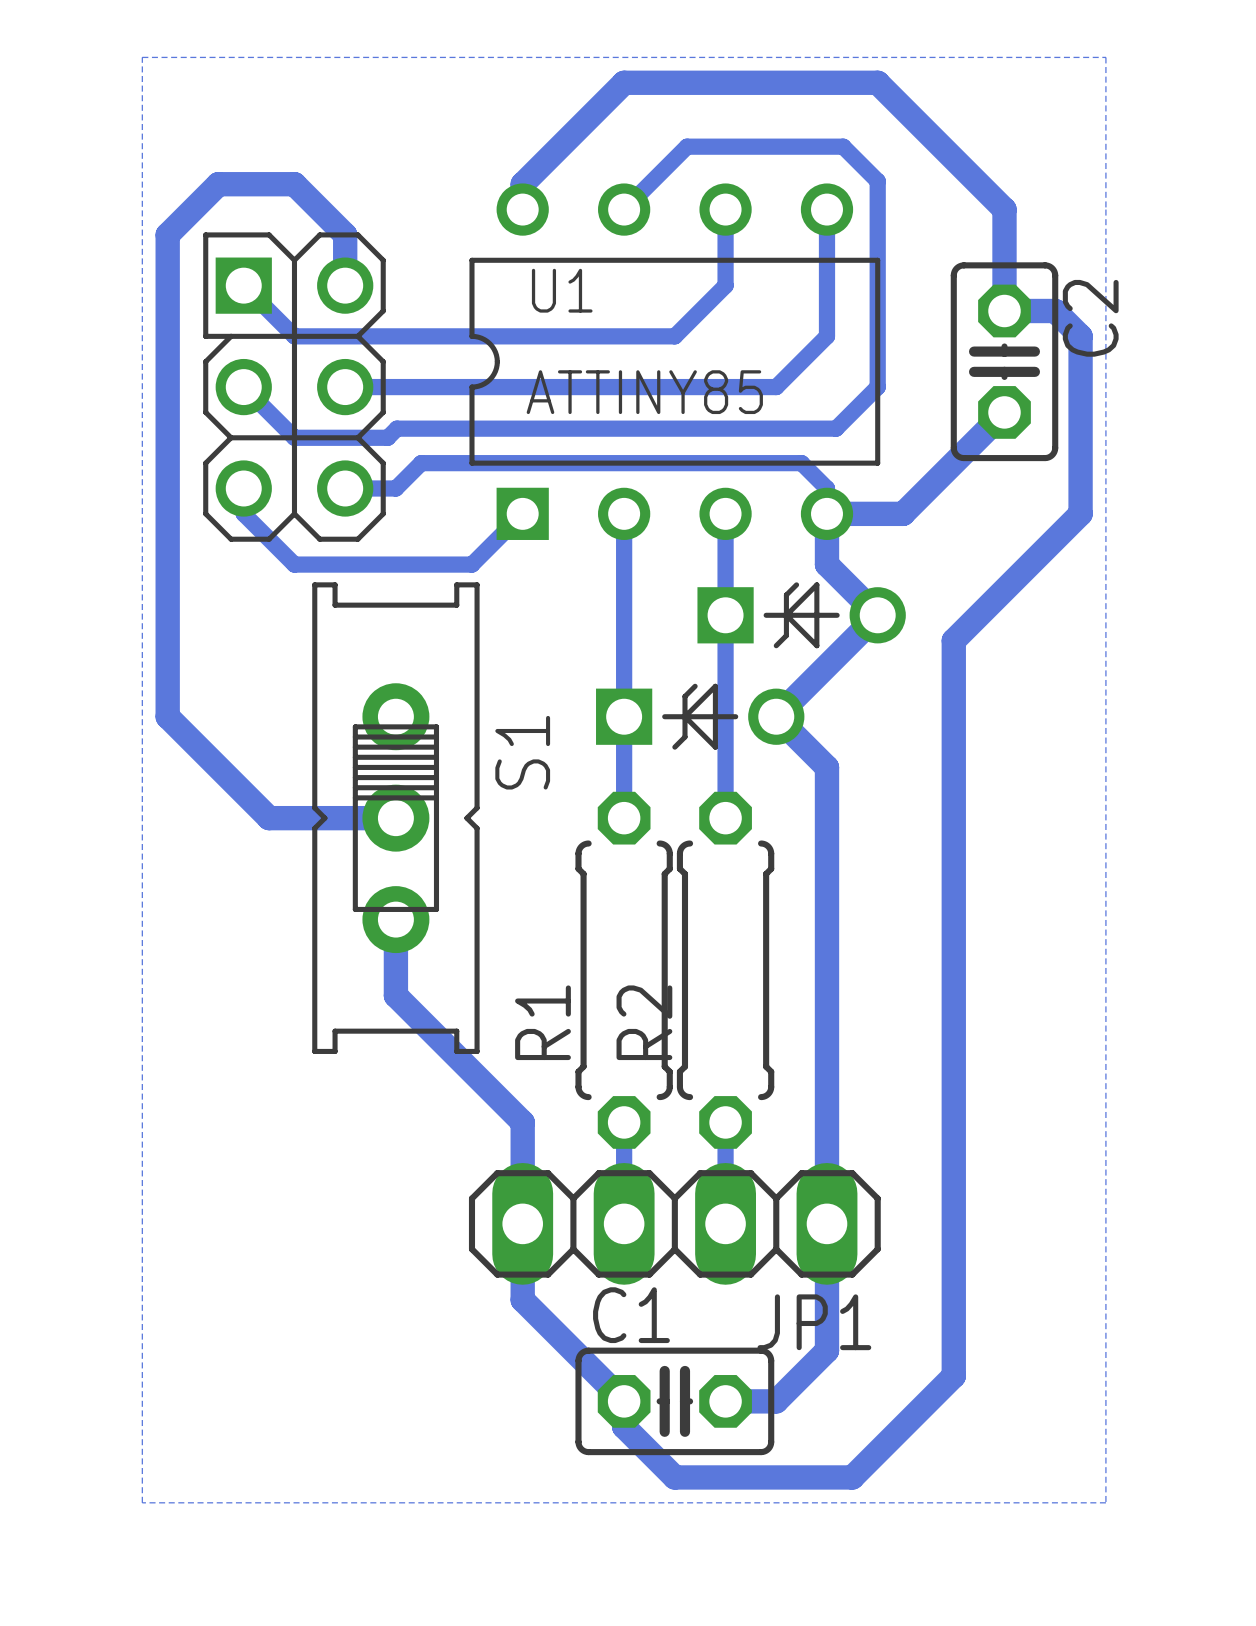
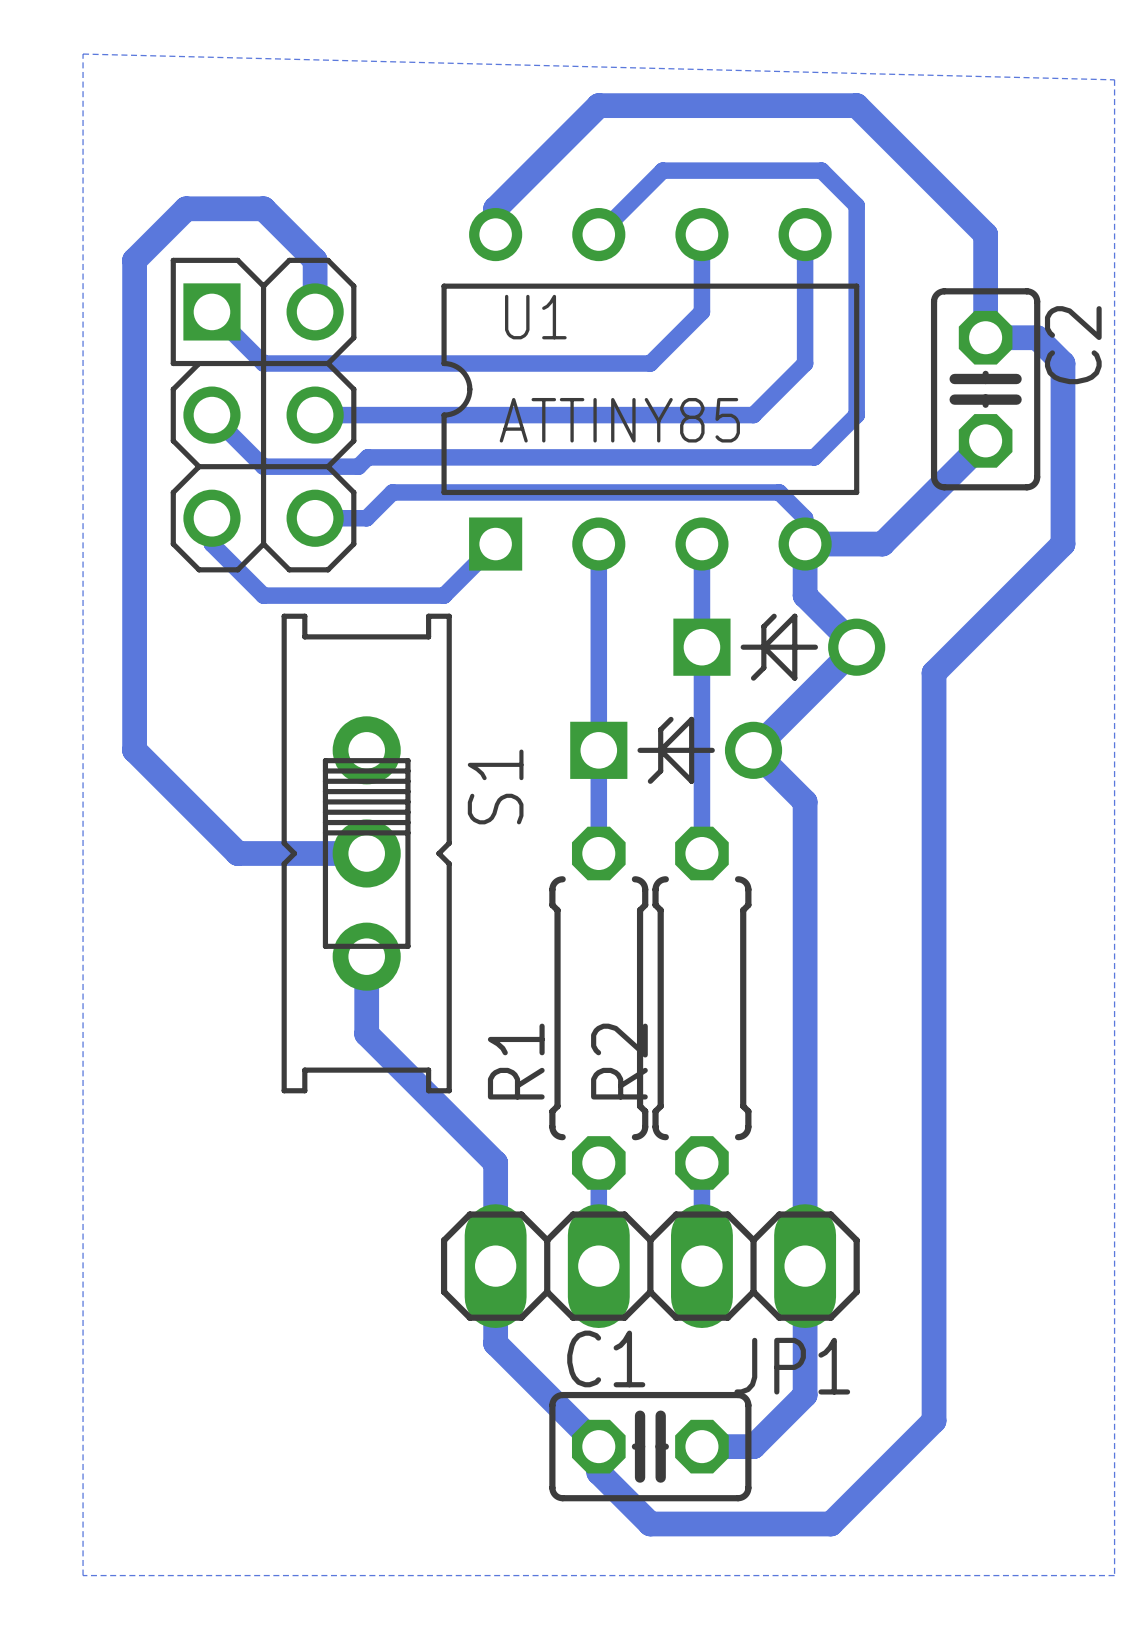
bottom zone outline: (142, 57) (1105, 57) (1105, 1502) (142, 1502) (142, 57) -> (83, 54) (83, 1575) (1114, 1575) (1114, 79) (83, 54)

